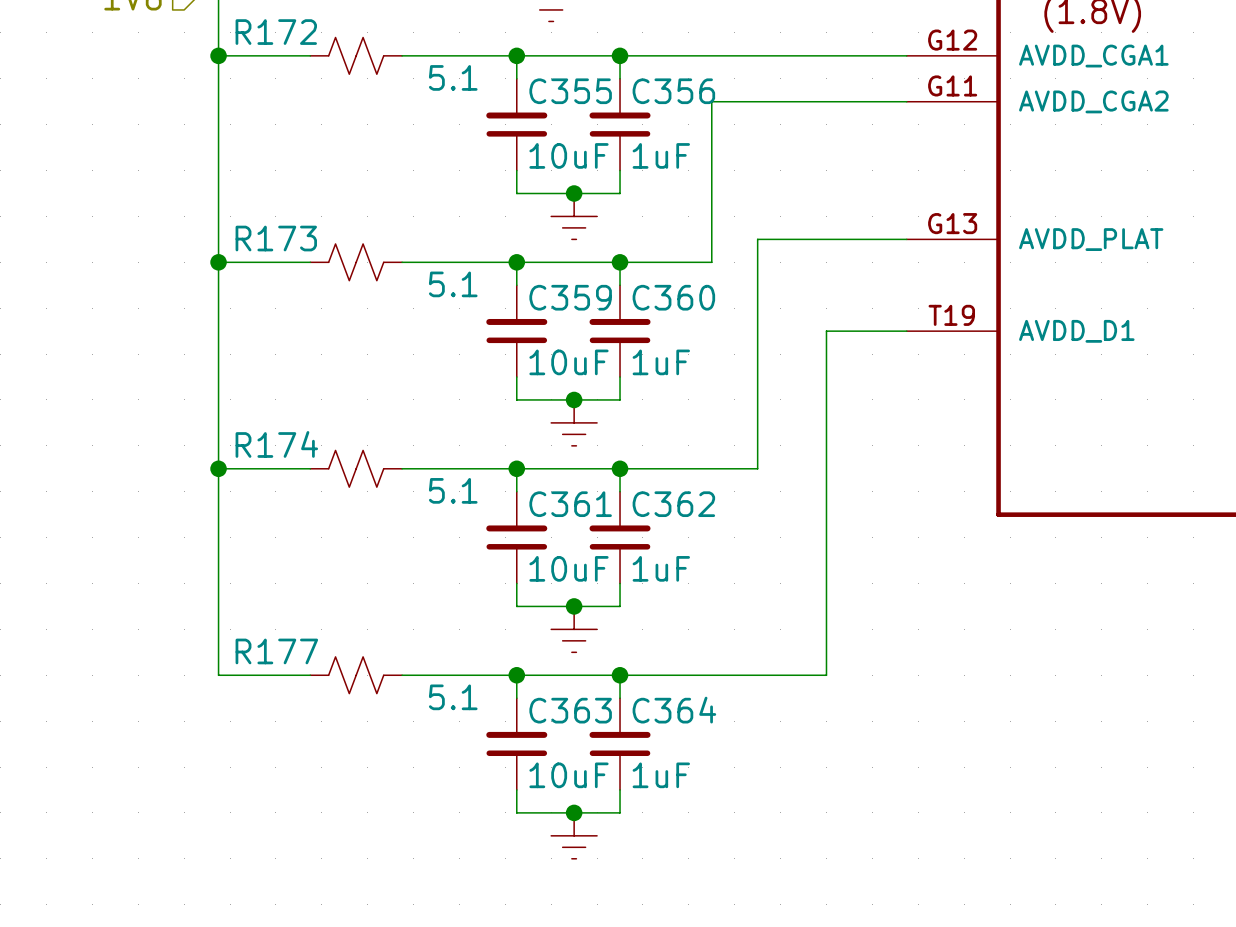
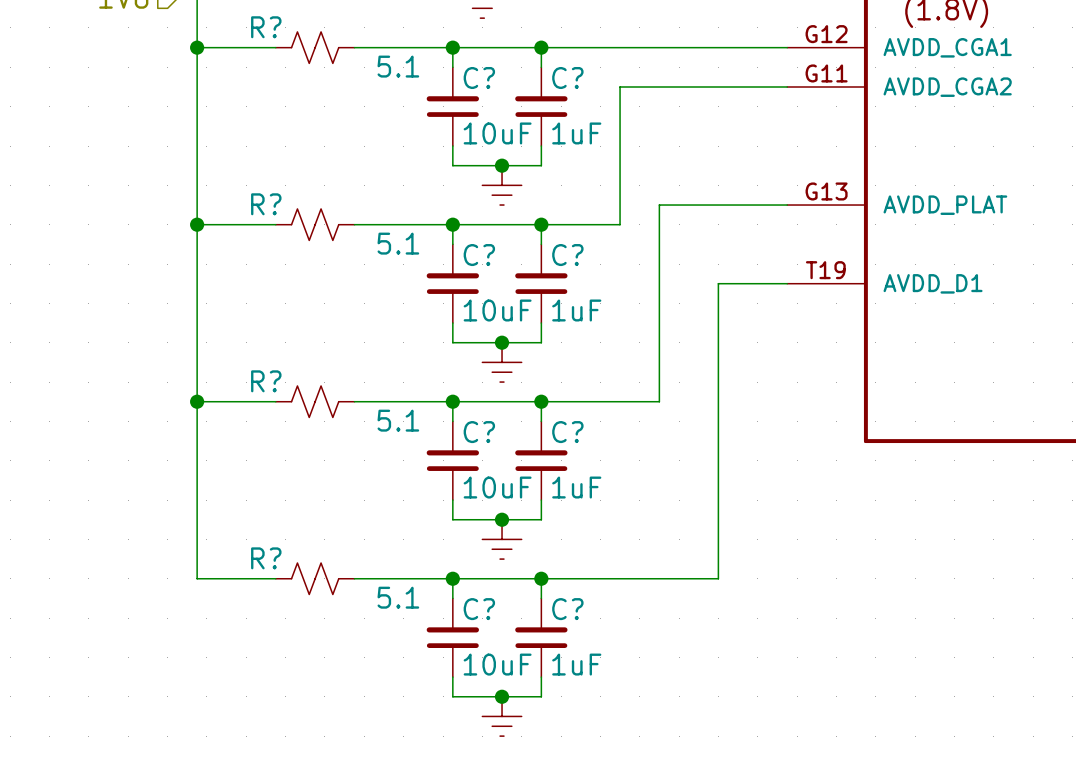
R172 name: R172 (276, 32) -> R? (266, 27)
C355 name: C355 (570, 91) -> C? (479, 78)
C356 name: C356 (673, 91) -> C? (567, 78)
R173 name: R173 (276, 238) -> R? (266, 204)
C359 name: C359 (570, 297) -> C? (479, 255)
C360 name: C360 (673, 297) -> C? (567, 255)
R174 name: R174 (276, 444) -> R? (266, 381)
C361 name: C361 (570, 504) -> C? (479, 432)
C362 name: C362 (673, 504) -> C? (567, 432)
R177 name: R177 (276, 651) -> R? (266, 558)
C363 name: C363 (570, 710) -> C? (479, 609)
C364 name: C364 (674, 710) -> C? (567, 609)

